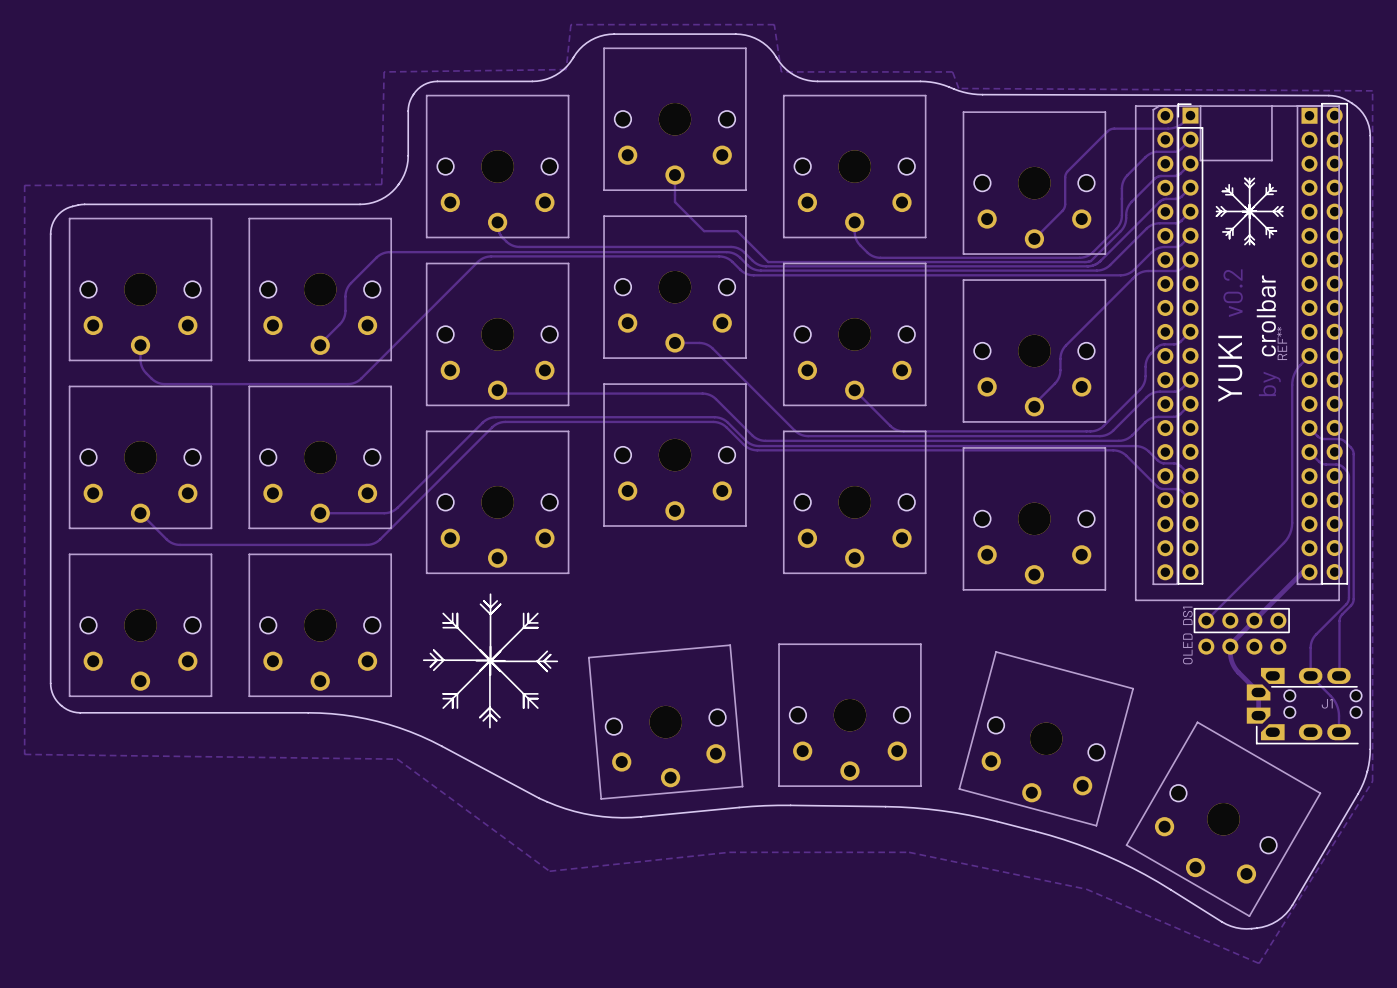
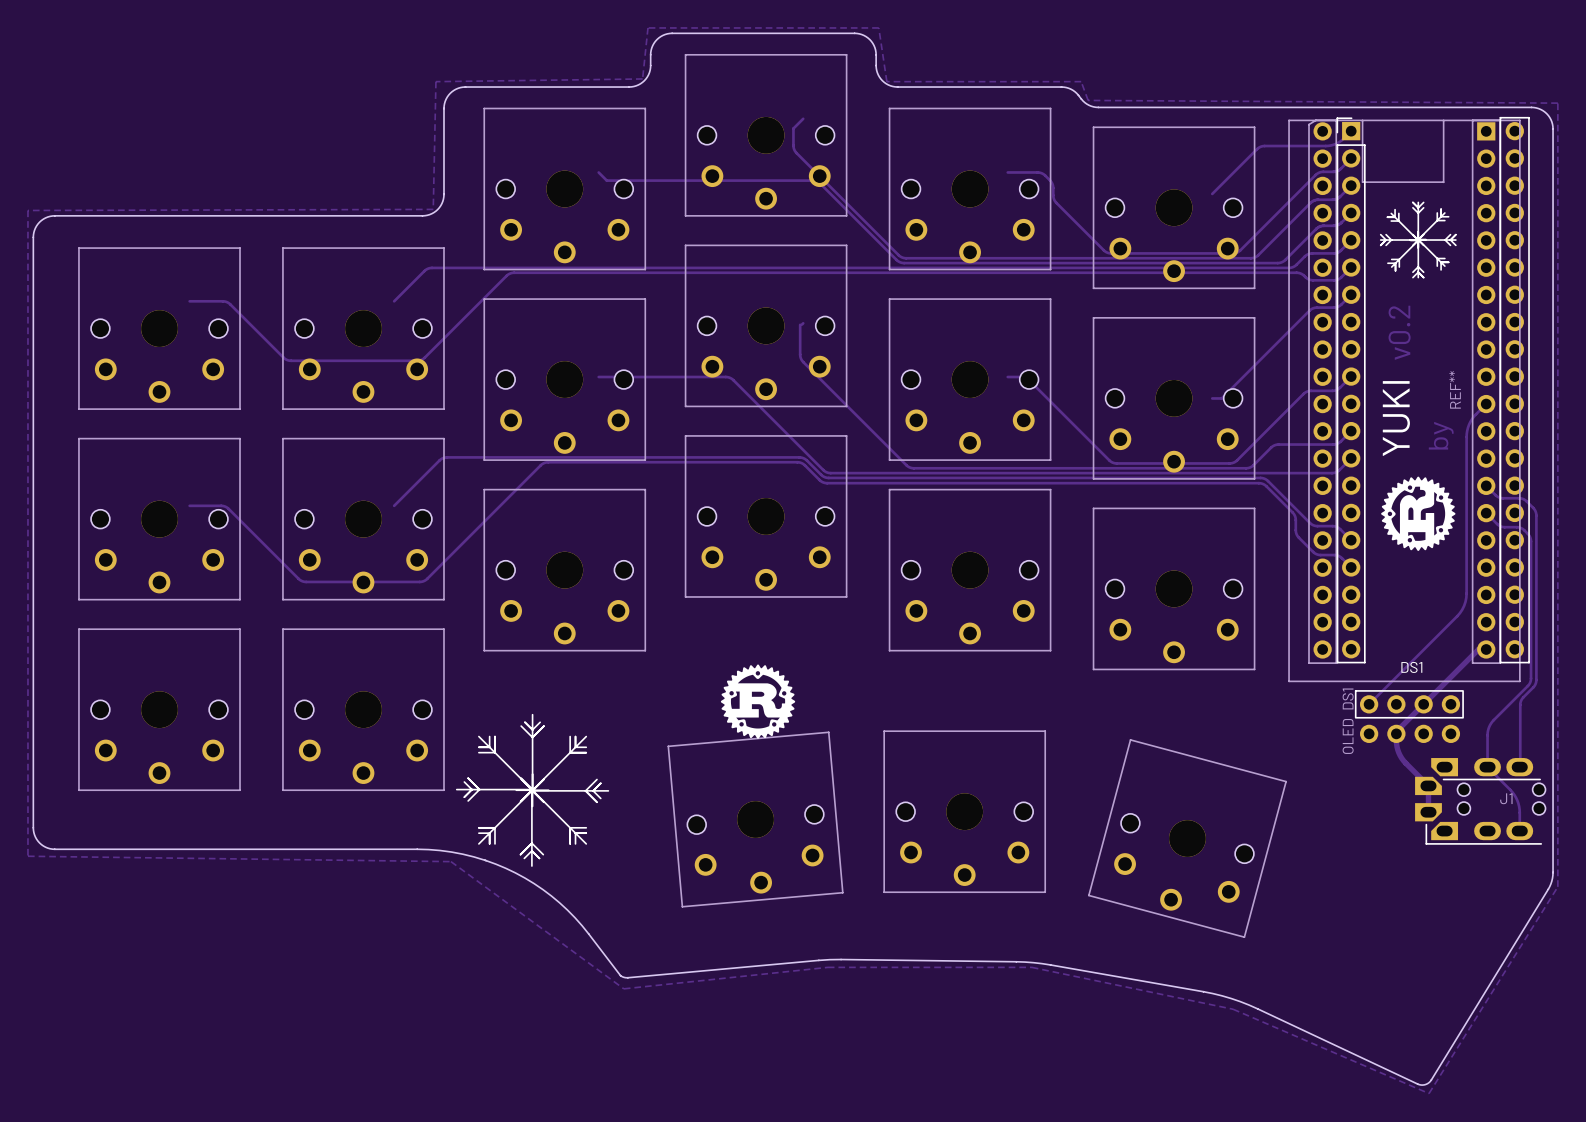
board edge: (614, 34) (745, 35) (766, 45) (790, 72) (812, 81) (925, 81) (939, 83) (968, 93) (982, 94) (1332, 95) (1348, 101) (1362, 113) (1369, 126) (1370, 135) (1369, 760) (1365, 777) (1358, 793) (1292, 905) (1281, 917) (1262, 927) (1246, 928) (1231, 926) (1145, 874) (1091, 849) (1035, 831) (955, 812) (899, 807) (777, 805) (631, 817) (602, 816) (574, 811) (547, 801) (431, 741) (399, 727) (365, 718) (319, 713) (80, 712) (67, 709) (56, 700) (50, 683) (50, 234) (52, 224) (56, 216) (66, 208) (84, 204) (360, 204) (373, 202) (392, 191) (404, 175) (407, 160) (408, 105) (412, 95) (420, 86) (437, 81) (532, 81) (546, 79) (563, 69) (586, 42) (599, 36) (614, 34) -> (672, 33) (662, 35) (655, 41) (651, 50) (648, 74) (642, 82) (633, 86) (465, 87) (452, 91) (446, 99) (444, 106) (443, 199) (439, 207) (429, 214) (54, 215) (45, 217) (38, 223) (33, 237) (33, 827) (38, 841) (45, 847) (54, 849) (417, 849) (451, 852) (496, 864) (515, 872) (542, 889) (574, 917) (620, 975) (624, 977) (829, 959) (1042, 963) (1203, 991) (1231, 998) (1257, 1008) (1417, 1084) (1424, 1084) (1428, 1082) (1548, 889) (1552, 875) (1553, 128) (1548, 115) (1540, 109) (1531, 107) (1095, 107) (1086, 104) (1075, 91) (1063, 87) (890, 85) (882, 80) (878, 74) (875, 50) (872, 43) (866, 36) (859, 33) (672, 33)
track: (1181, 148) (1176, 151) (1150, 153) (1127, 175) (1122, 186) (1121, 217) (1119, 224) (1092, 252) (1084, 257) (876, 257) (868, 253) (857, 241) (854, 222) -> (1340, 168) (1336, 171) (1322, 171) (1316, 174) (1240, 250) (1232, 253) (1107, 252) (1055, 202) (1052, 183) (1044, 174) (1038, 172) (1007, 172)
track: (1068, 170) (1065, 176) (1064, 208) (1034, 238) -> none
track: (674, 175) (674, 202) (704, 231) (737, 231) (768, 262) (1088, 261) (1122, 228) (1126, 210) (1131, 201) -> (803, 118) (793, 128) (795, 151) (898, 255) (904, 258) (1251, 258) (1257, 255) (1284, 229)
track: (497, 222) (500, 235) (509, 243) (515, 246) (733, 247) (742, 250) (757, 264) (766, 266) (1088, 266) (1099, 261) (1132, 229) -> (598, 172) (606, 180) (815, 180) (896, 259) (903, 263) (1277, 263) (1285, 259)
track: (1159, 223) (1147, 227) (1108, 266) (1096, 270) (758, 270) (750, 267) (736, 254) (726, 252) (387, 252) (377, 256) (349, 285) (345, 294) (343, 319) (320, 345) -> (1316, 253) (1307, 254) (1294, 266) (1288, 267) (430, 267) (425, 270) (394, 301)
track: (1164, 246) (1154, 250) (1132, 271) (1120, 275) (753, 275) (744, 273) (730, 260) (721, 256) (487, 256) (477, 261) (361, 378) (350, 383) (161, 383) (152, 379) (143, 369) (140, 362) (140, 345) -> (1322, 280) (1310, 279) (1296, 272) (513, 272) (506, 275) (424, 357) (417, 360) (288, 360) (228, 303) (222, 301) (189, 301)
track: (1160, 271) (1144, 271) (1136, 275) (1065, 345) (1061, 353) (1058, 379) (1034, 404) -> (1317, 307) (1309, 310) (1221, 398) (1212, 398)
track: none -> (803, 323) (802, 324)
text: crolbar (1266, 315) -> none
track: (674, 342) (701, 343) (710, 346) (794, 430) (806, 436) (1102, 435) (1111, 432) (1148, 395) (1160, 391) -> (800, 324) (800, 355) (802, 361) (906, 465) (911, 468) (1247, 468) (1252, 465) (1275, 444) (1316, 444)
track: (1164, 344) (1157, 346) (1147, 357) (1144, 381) (1141, 387) (1102, 427) (1092, 431) (901, 431) (890, 425) (854, 390) -> (1321, 390) (1310, 390) (1304, 393) (1232, 463) (1116, 463) (1109, 460) (1025, 377) (1007, 377)
track: (497, 390) (500, 393) (705, 393) (715, 399) (753, 436) (765, 440) (1118, 440) (1128, 438) (1147, 420) (1158, 416) -> (598, 377) (729, 377) (823, 469) (829, 473) (1314, 473)
drawing: none -> [1381, 476, 1456, 551]
track: (1163, 463) (1175, 463) (1180, 466) -> (394, 505) (439, 460) (445, 457) (799, 457) (806, 459) (822, 476) (828, 477) (1261, 478) (1268, 481) (1311, 524) (1334, 526) (1340, 529)
track: (1163, 463) (1147, 449) (1137, 446) (759, 446) (748, 442) (726, 421) (717, 417) (494, 417) (482, 422) (393, 510) (384, 513) (320, 513) -> none
track: (1163, 489) (1157, 486) (1124, 454) (1115, 450) (757, 450) (746, 447) (724, 425) (715, 422) (505, 421) (492, 427) (380, 539) (371, 544) (178, 544) (168, 540) (140, 513) -> (1320, 555) (1313, 552) (1297, 536) (1293, 513) (1265, 485) (1259, 483) (827, 483) (821, 481) (804, 464) (798, 462) (548, 462) (540, 465) (424, 580) (306, 581) (298, 578) (227, 507) (221, 505) (189, 505)
drawing: none -> [720, 664, 796, 739]
text: none -> DS1 (1411, 667)
drawing position: (490, 660) -> (532, 790)
part: (1223, 819) -> none

